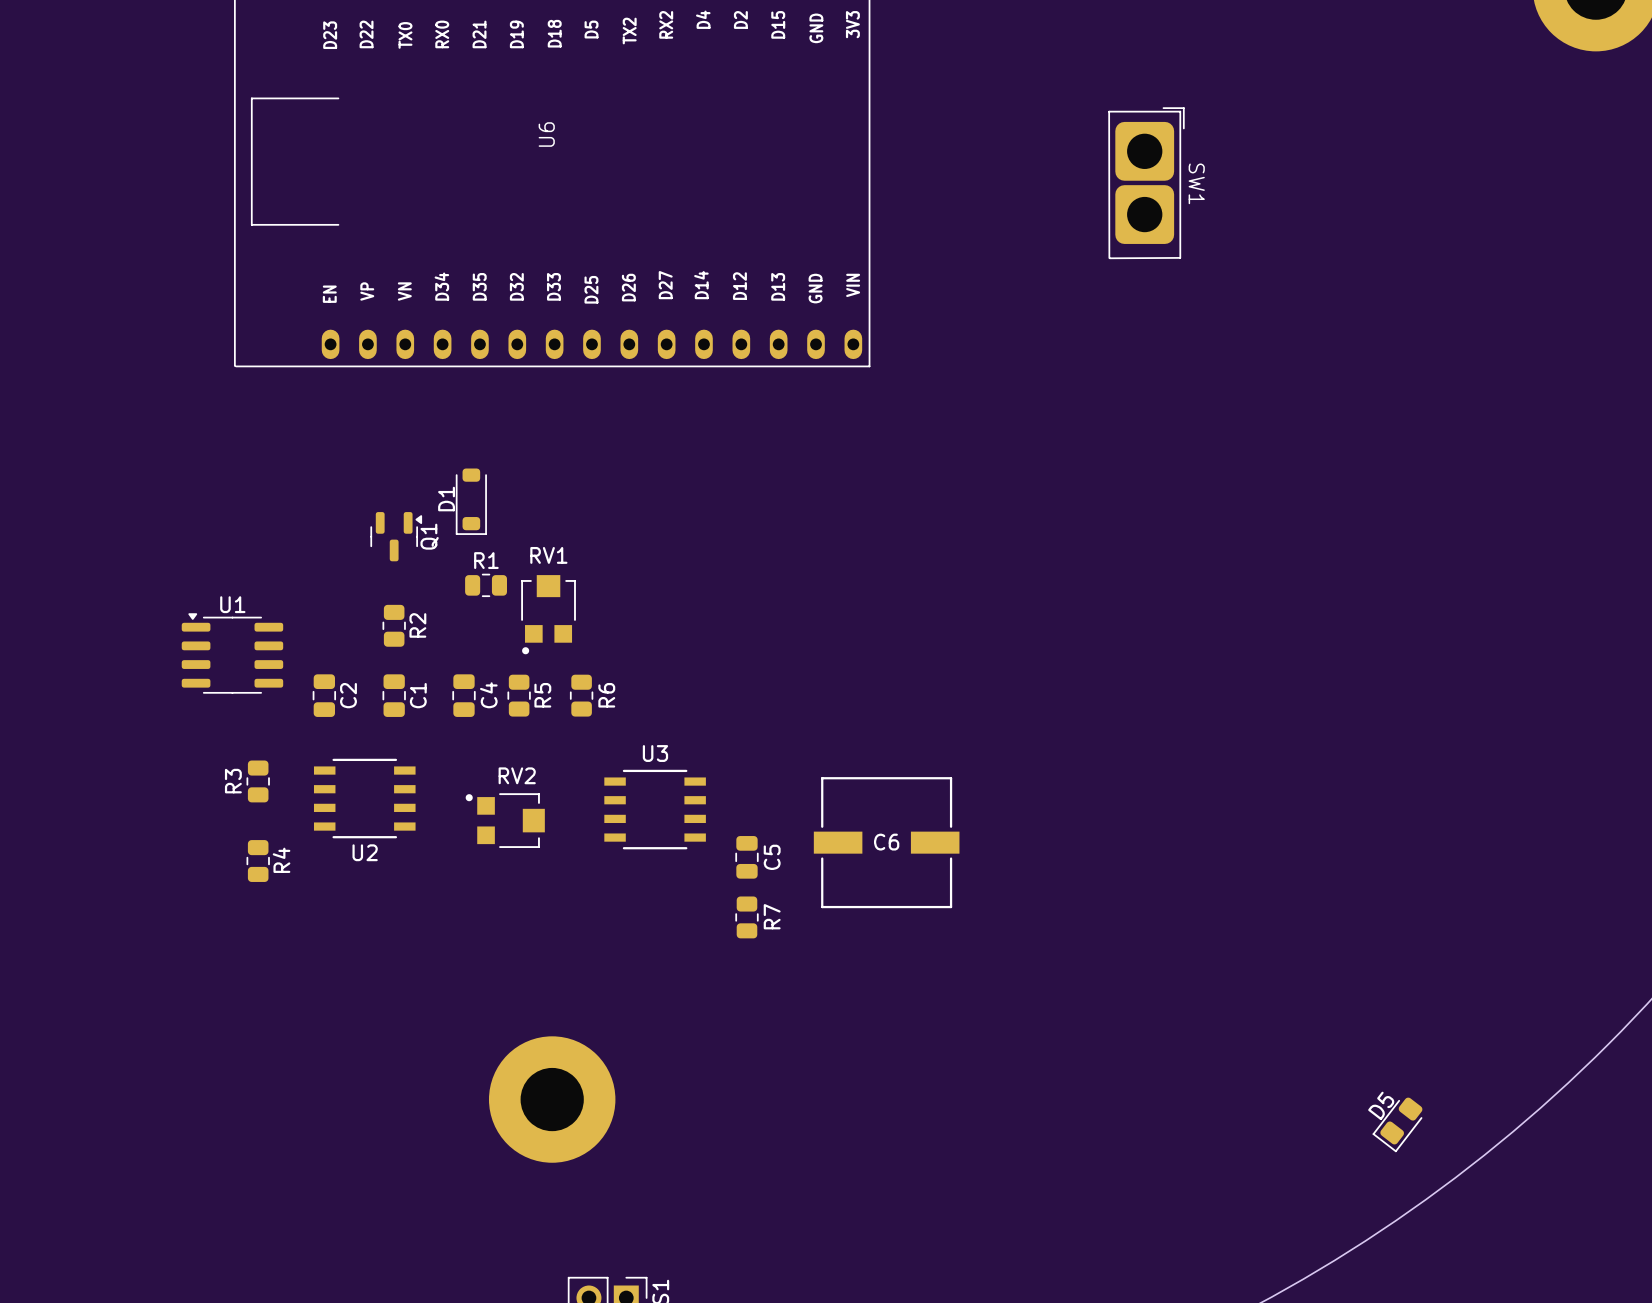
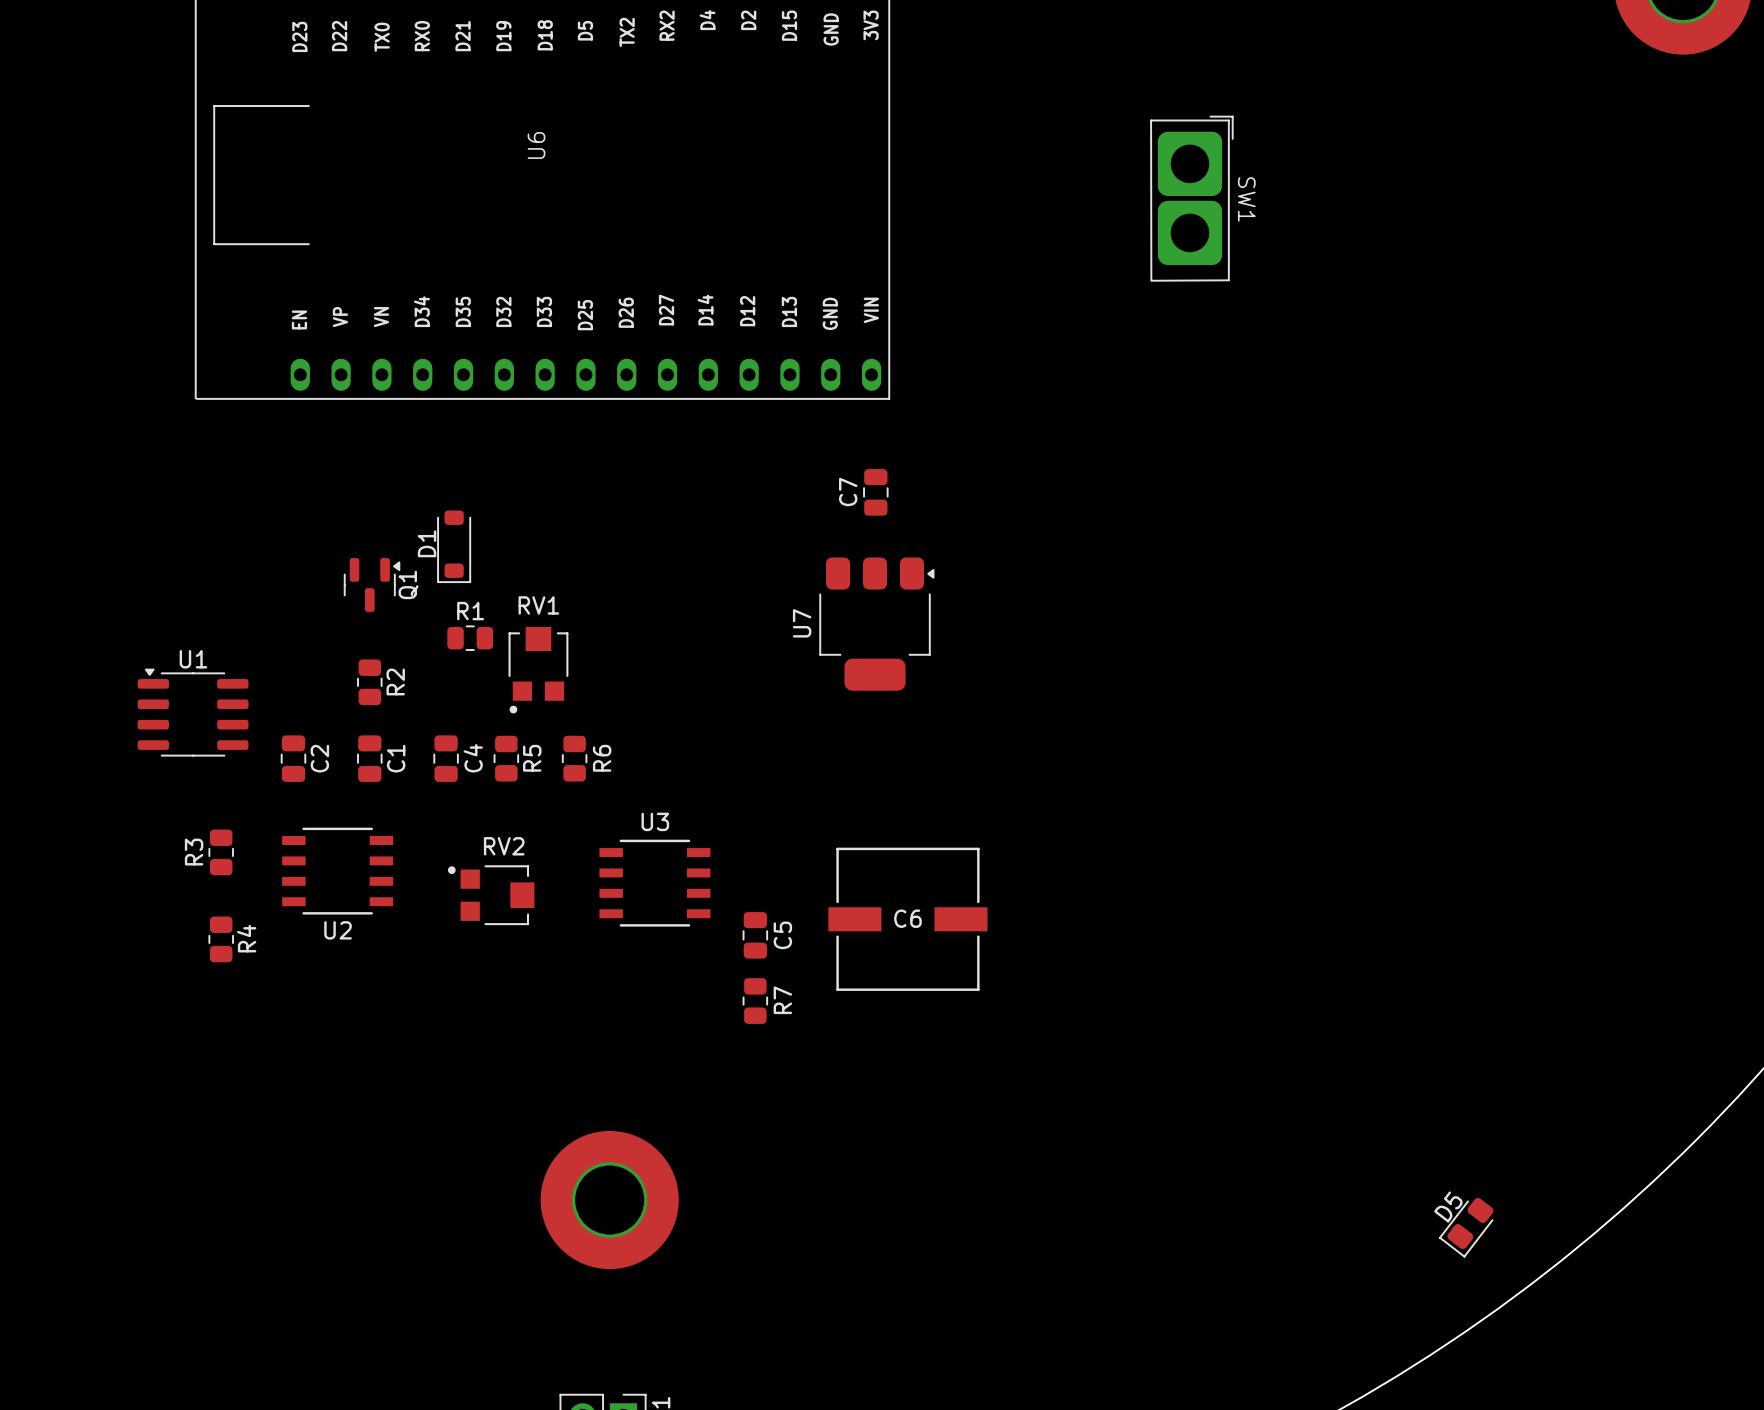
C7: none -> (875, 492)
U7: none -> (876, 624)
part position: (552, 1099) -> (609, 1200)

